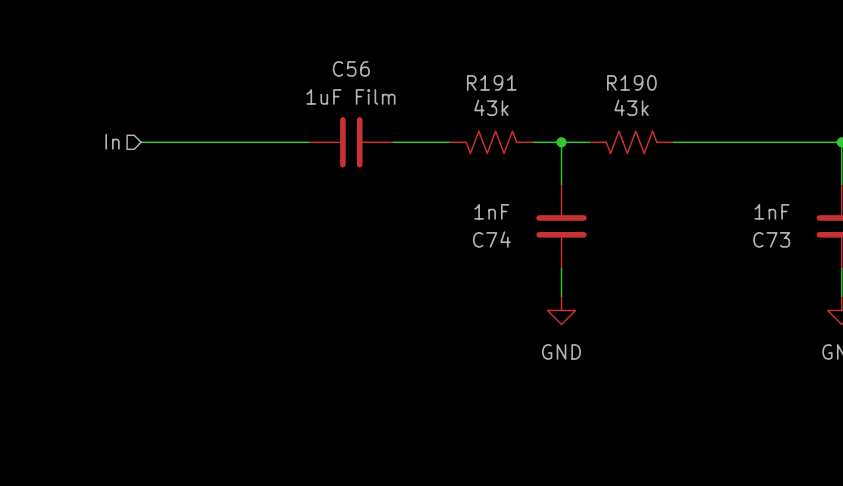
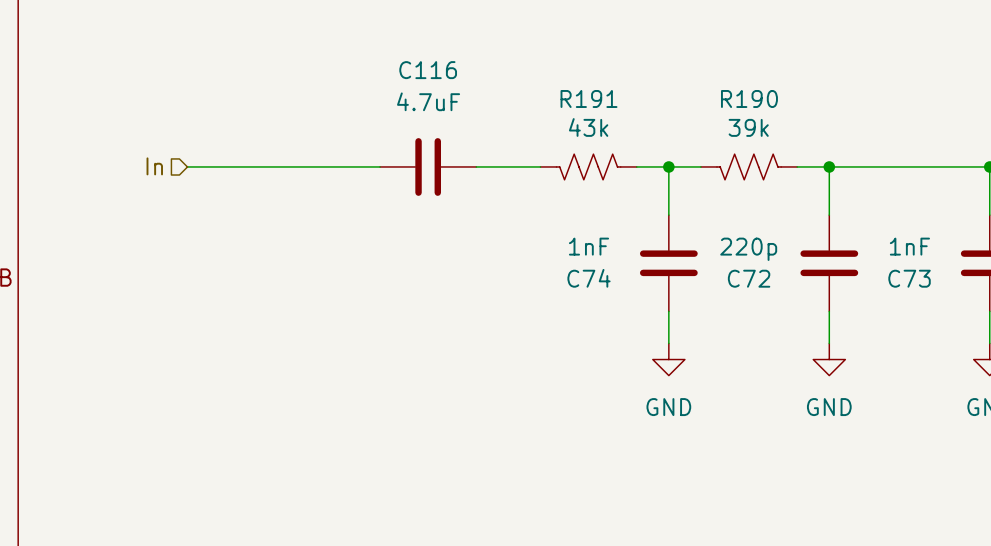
C56 name: C56 (351, 68) -> C116 (428, 70)
C56 value: 1uF Film (350, 96) -> 4.7uF (428, 101)
R190 value: 43k (631, 107) -> 39k (748, 127)
wire: none -> (829, 166) (829, 215)
junction: none -> (829, 166)
C72: none -> 220p (829, 263)
wire: none -> (829, 311) (829, 343)
power symbol: none -> GND (829, 359)

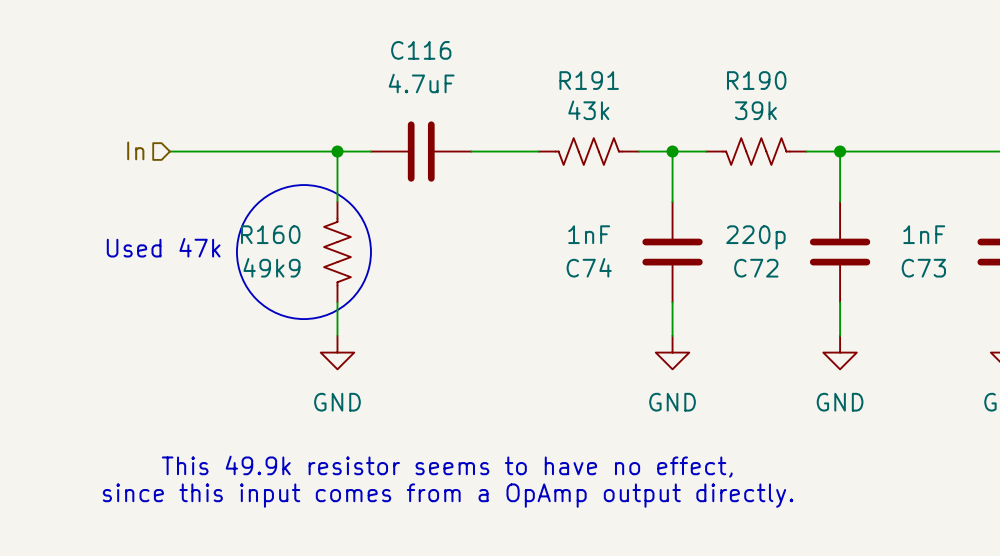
wire: none -> (337, 151) (337, 201)
junction: none -> (337, 151)
drawing: none -> [236, 185, 371, 320]
text: none -> Used 47k (163, 247)
R160: none -> 49k9 (337, 252)
wire: none -> (337, 302) (337, 335)
power symbol: none -> GND (337, 352)
text: none -> This 49.9k resistor seems to have no effect, (447, 466)
text: none -> since this input comes from a OpAmp output directly. (448, 495)

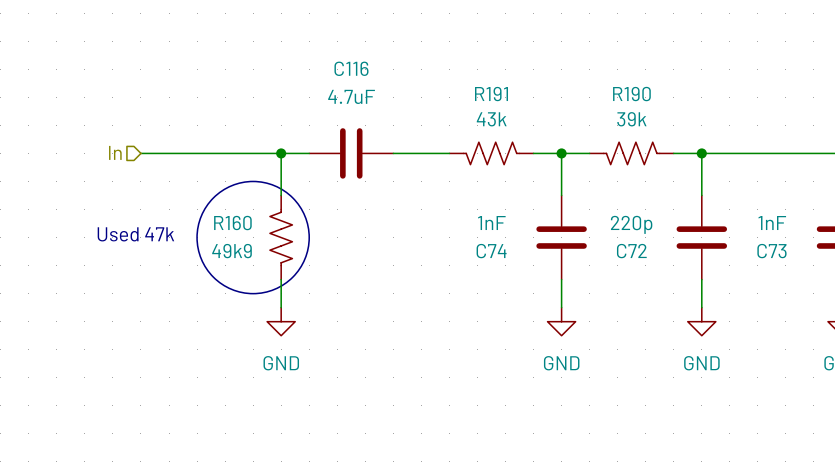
text: This 49.9k resistor seems to have no effect, (447, 466) -> none
text: since this input comes from a OpAmp output directly. (448, 495) -> none

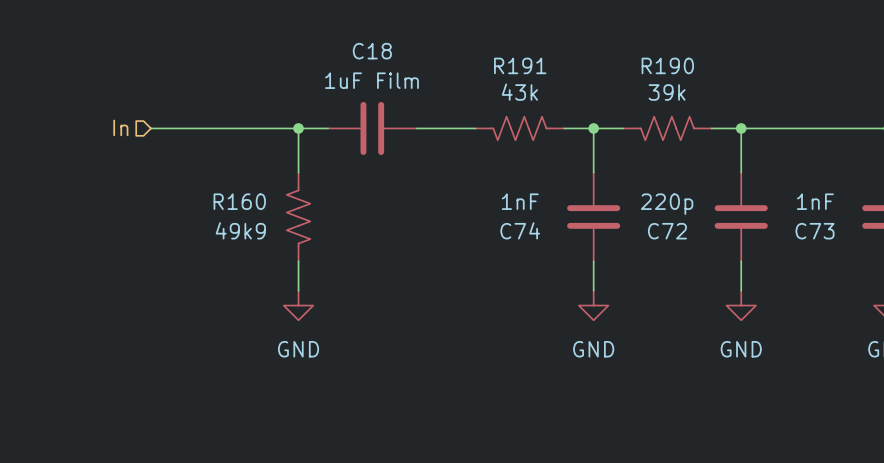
C116 name: C116 (351, 68) -> C18 (372, 51)
C116 value: 4.7uF (351, 96) -> 1uF Film (371, 80)
drawing: [197, 181, 310, 294] -> none
text: Used 47k (135, 234) -> none

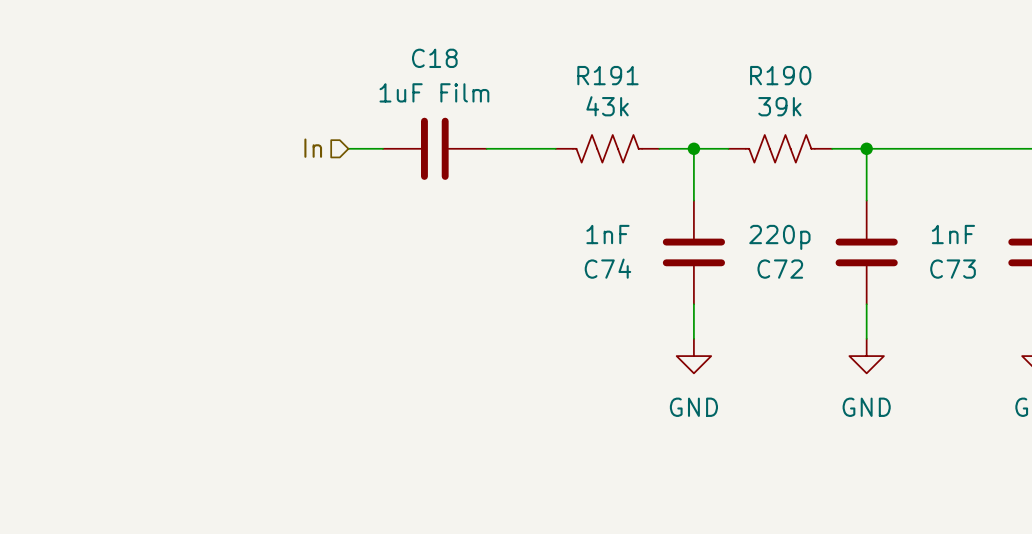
hierarchical label position: In (120, 127) -> In (313, 148)
wire: (150, 128) (298, 128) (298, 172) -> none
junction: (298, 128) -> none
R160: 49k9 (298, 216) -> none
wire: (298, 261) (298, 290) -> none
power symbol: GND (298, 305) -> none

